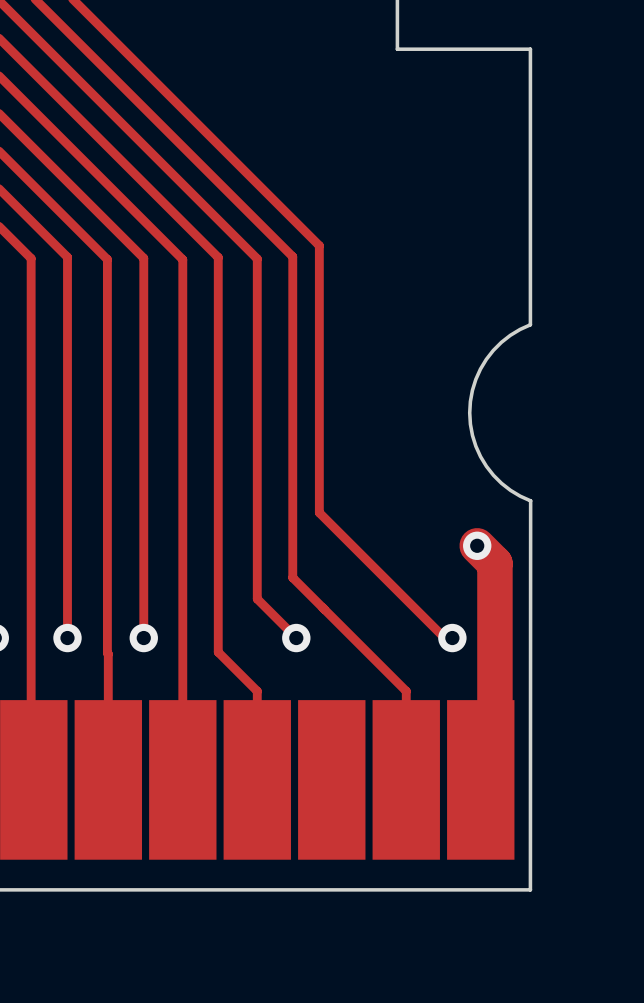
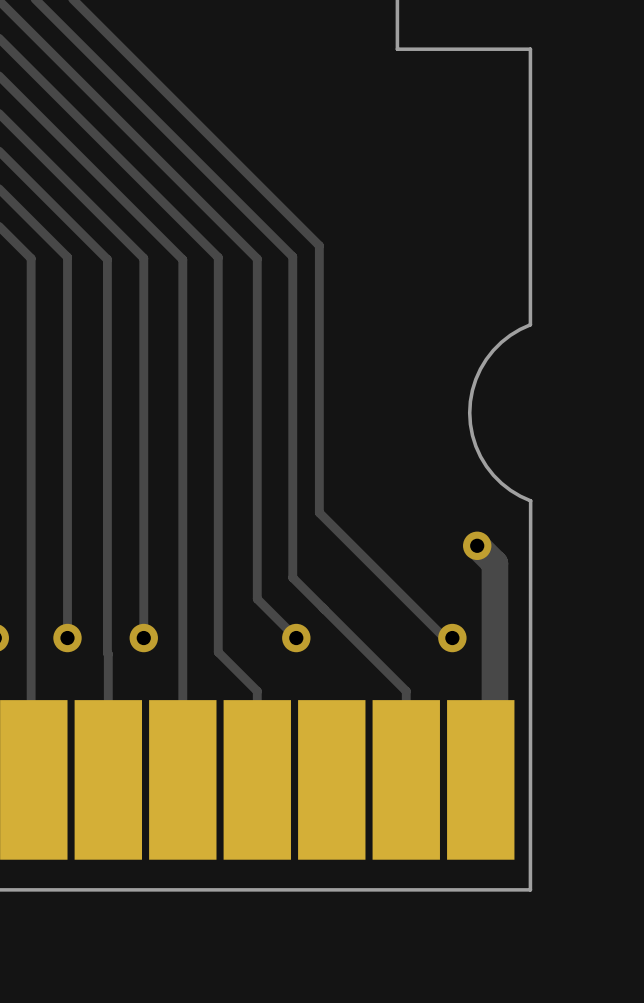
track width: thick (477, 545) (494, 563) (494, 765) (480, 779) -> thin (477, 545) (494, 563) (494, 765) (480, 779)

